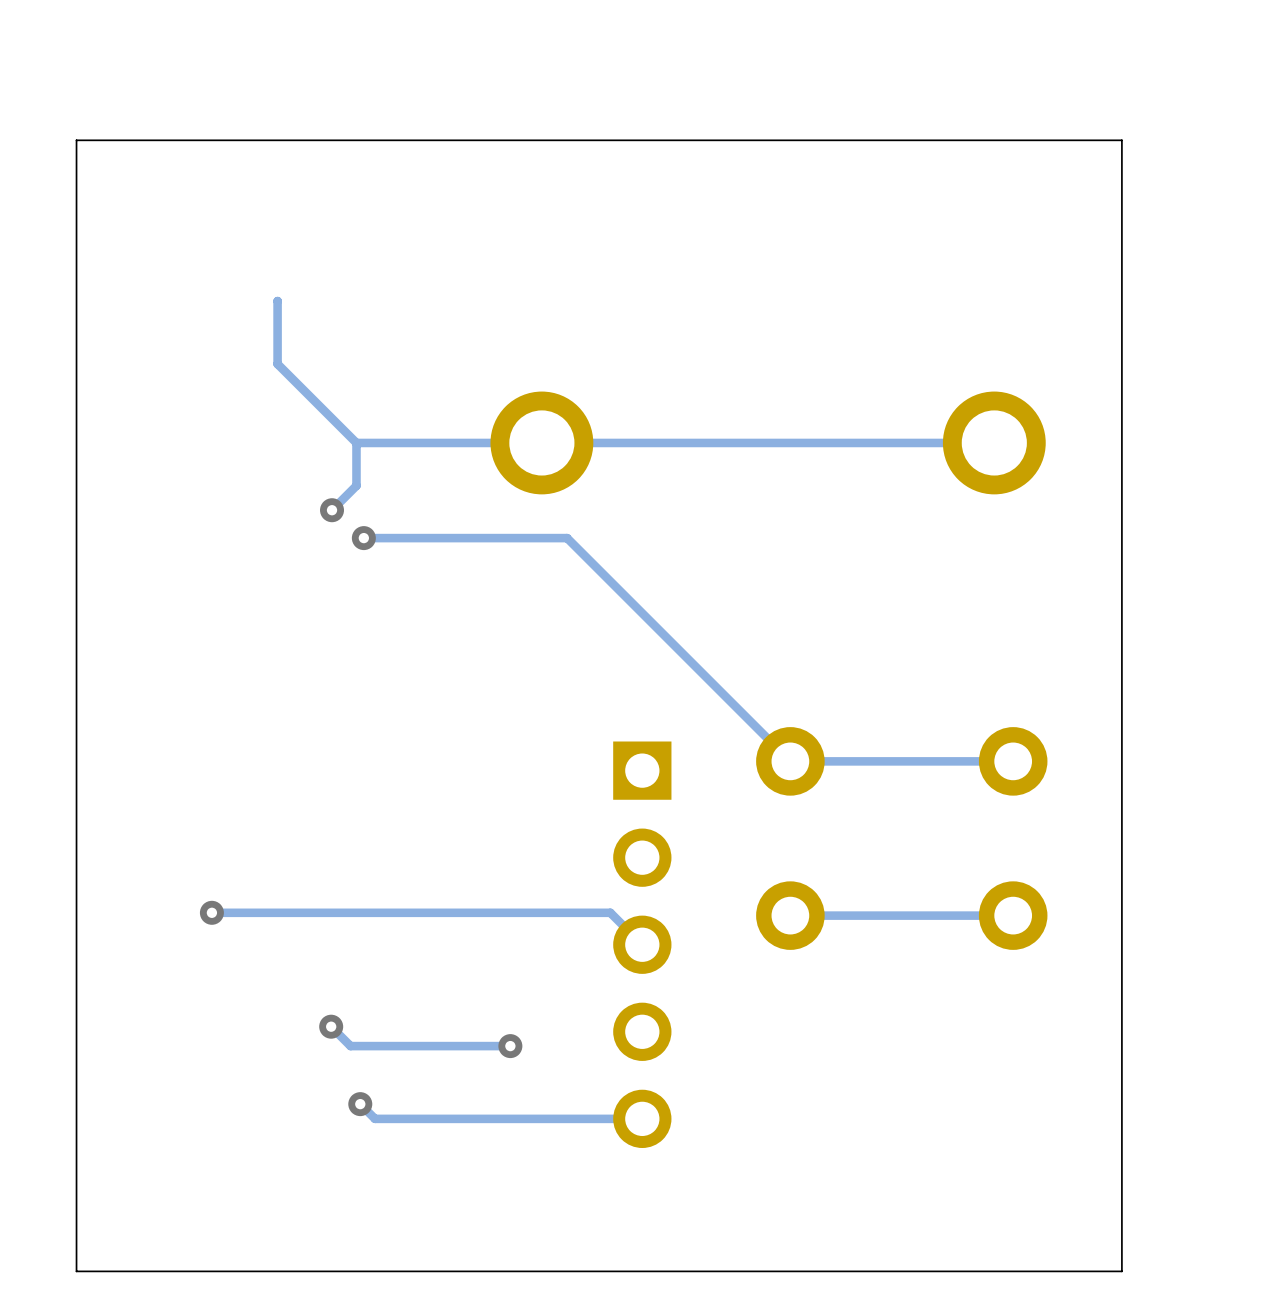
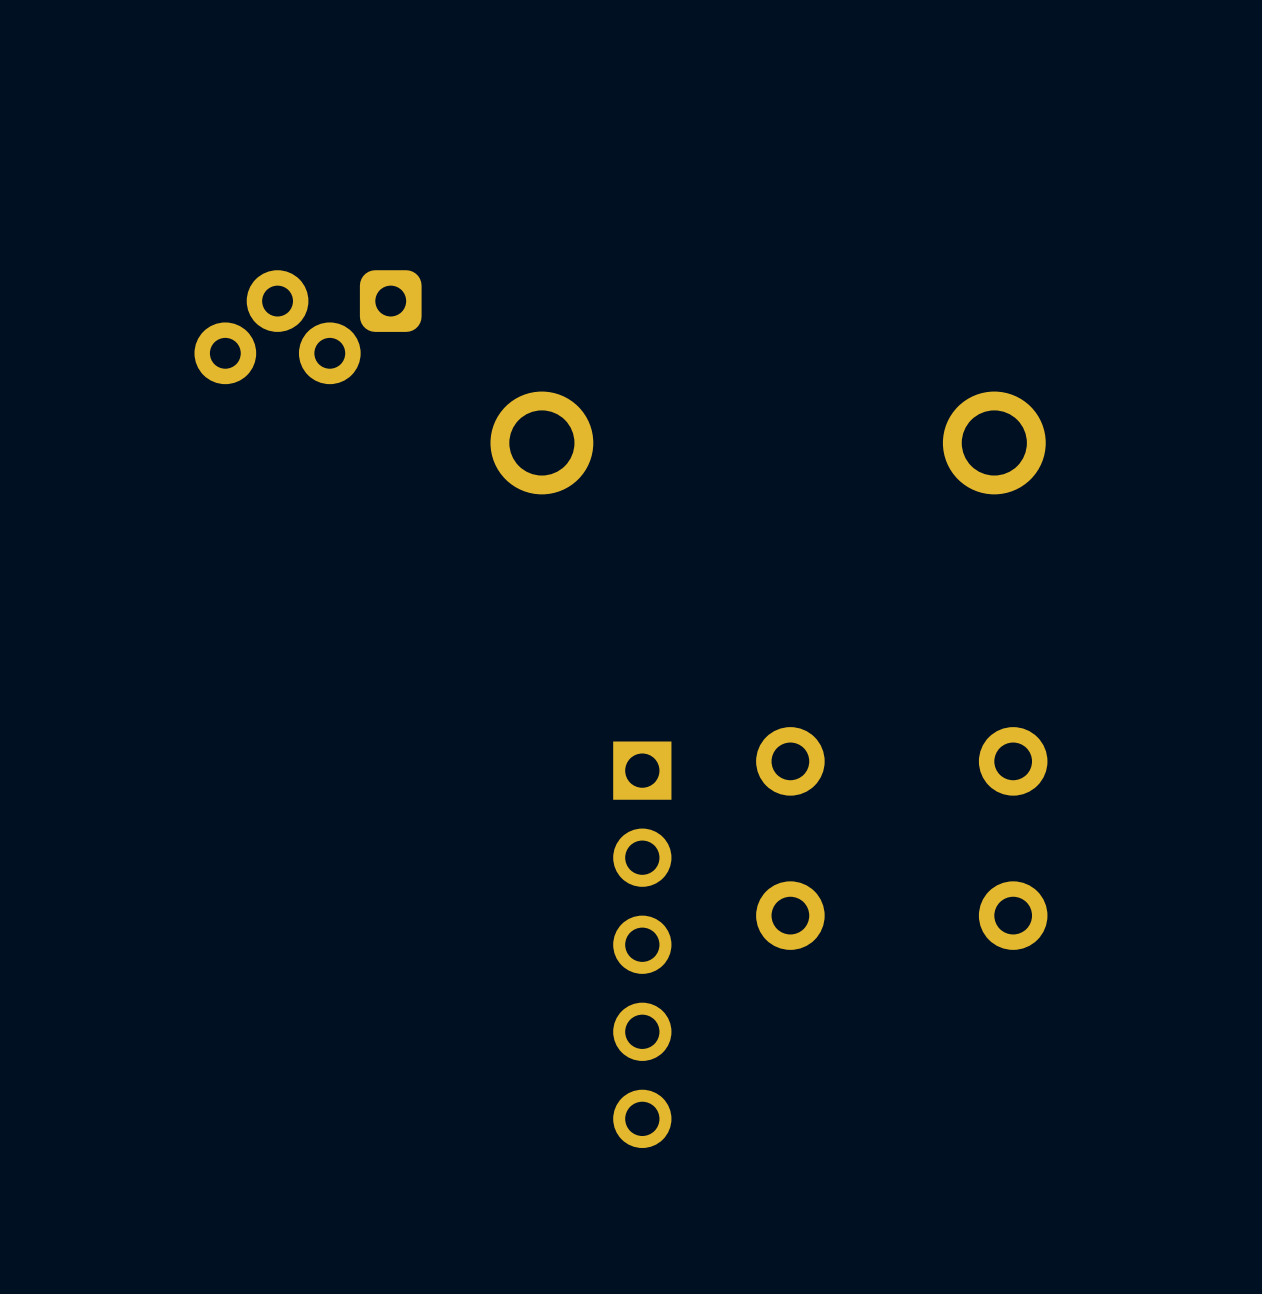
board edge: (1121, 140) (76, 140) (76, 1271) (1121, 1271) (1121, 140) -> none
track: (277, 301) (277, 364) (356, 442) -> none
part: none -> (308, 327)
track: (356, 442) (356, 485) (332, 510) -> none
track: (994, 442) (356, 442) -> none
via: (332, 510) -> none
track: (363, 538) (567, 538) (790, 761) (1013, 761) -> none
via: (363, 538) -> none
track: (211, 912) (610, 912) (642, 944) -> none
via: (211, 912) -> none
track: (1013, 915) (790, 915) -> none
track: (331, 1026) (350, 1046) (510, 1046) -> none
via: (331, 1026) -> none
via: (510, 1046) -> none
track: (360, 1104) (375, 1118) (642, 1118) -> none
via: (360, 1104) -> none

